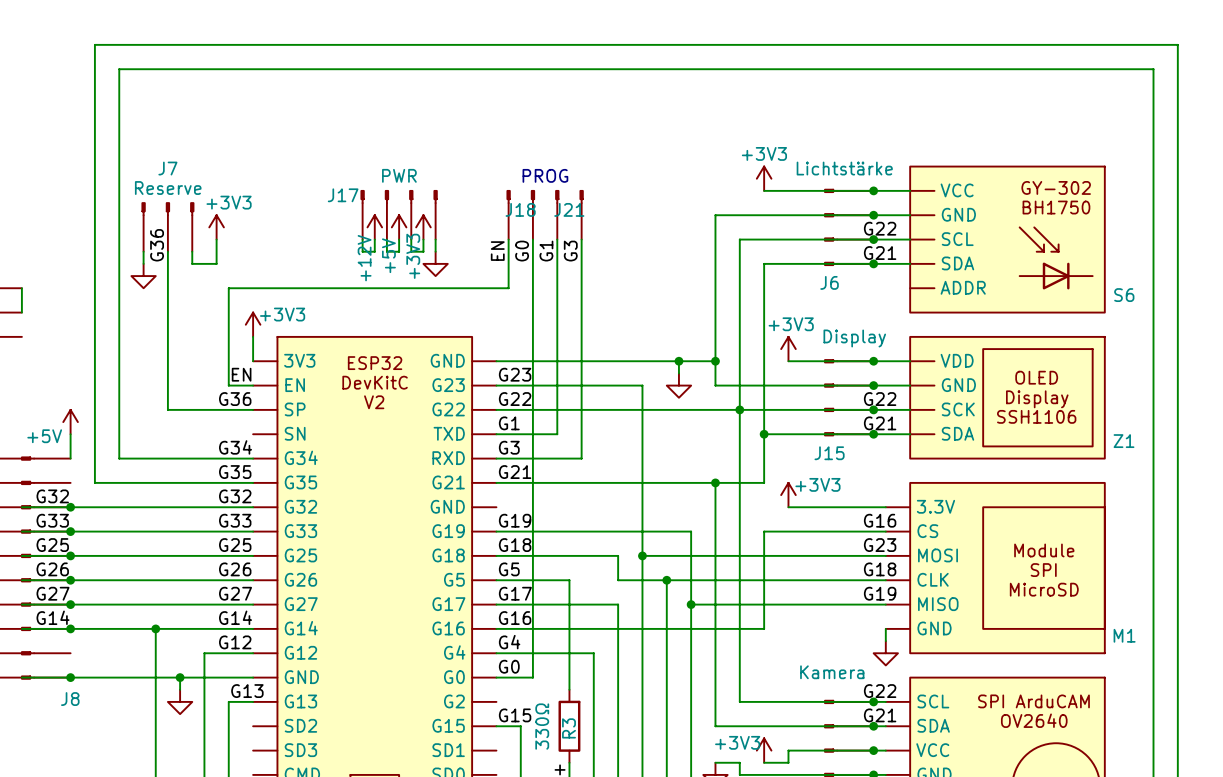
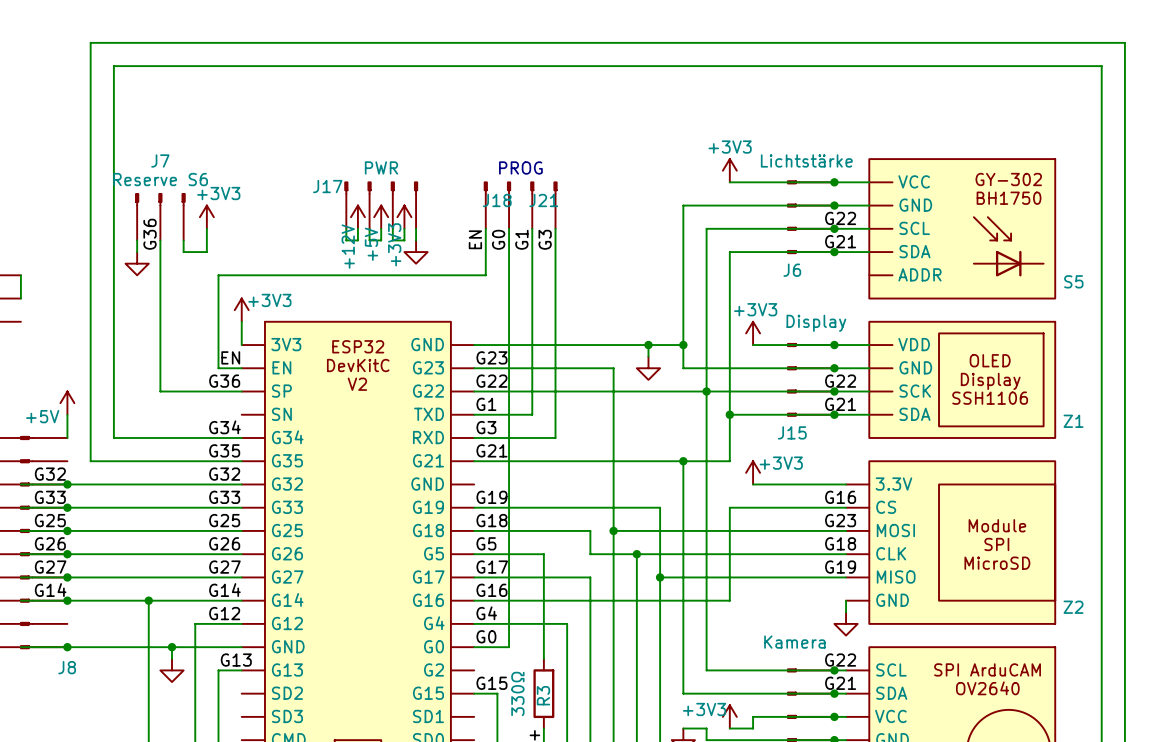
J7 value: Reserve (168, 188) -> Reserve S6 (160, 179)
S6 name: S6 (1124, 295) -> S5 (1073, 281)
M1 name: M1 (1124, 635) -> Z2 (1073, 607)

